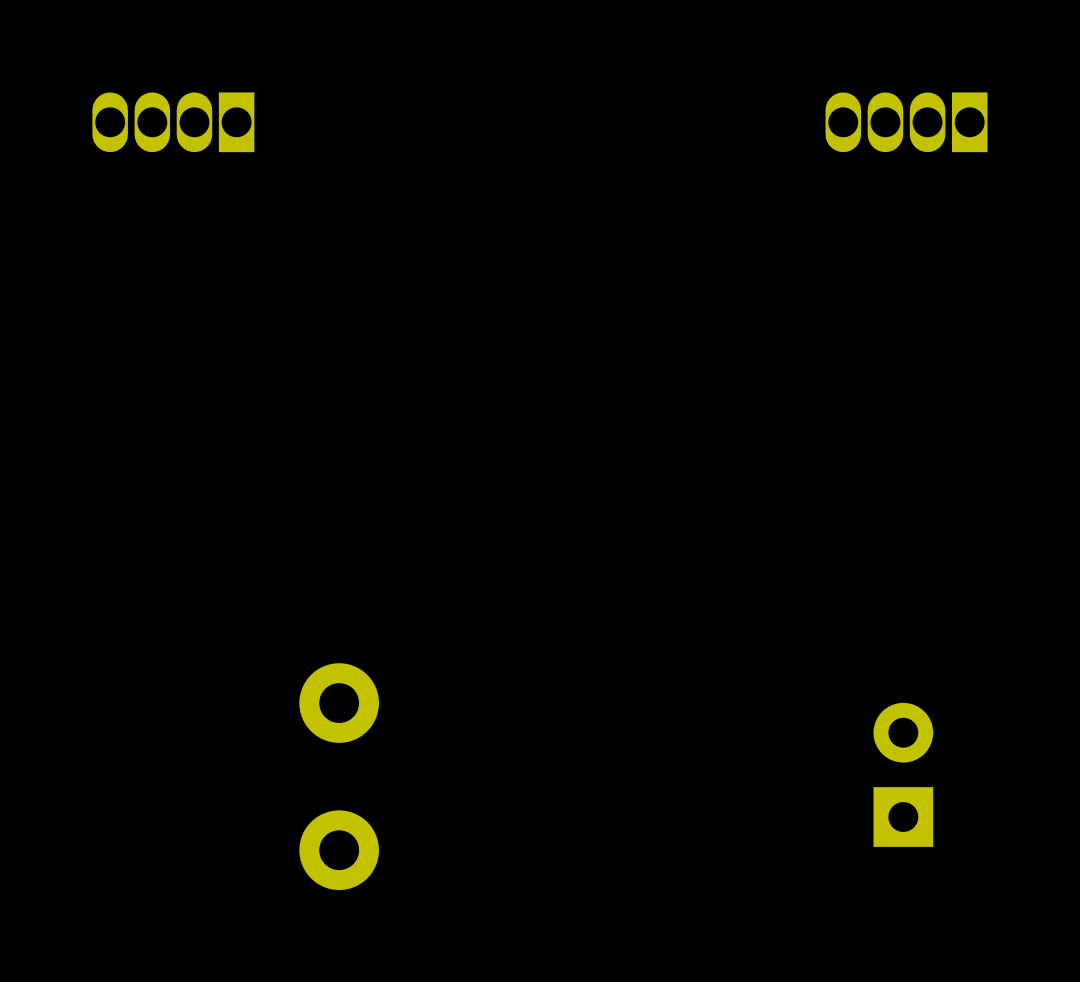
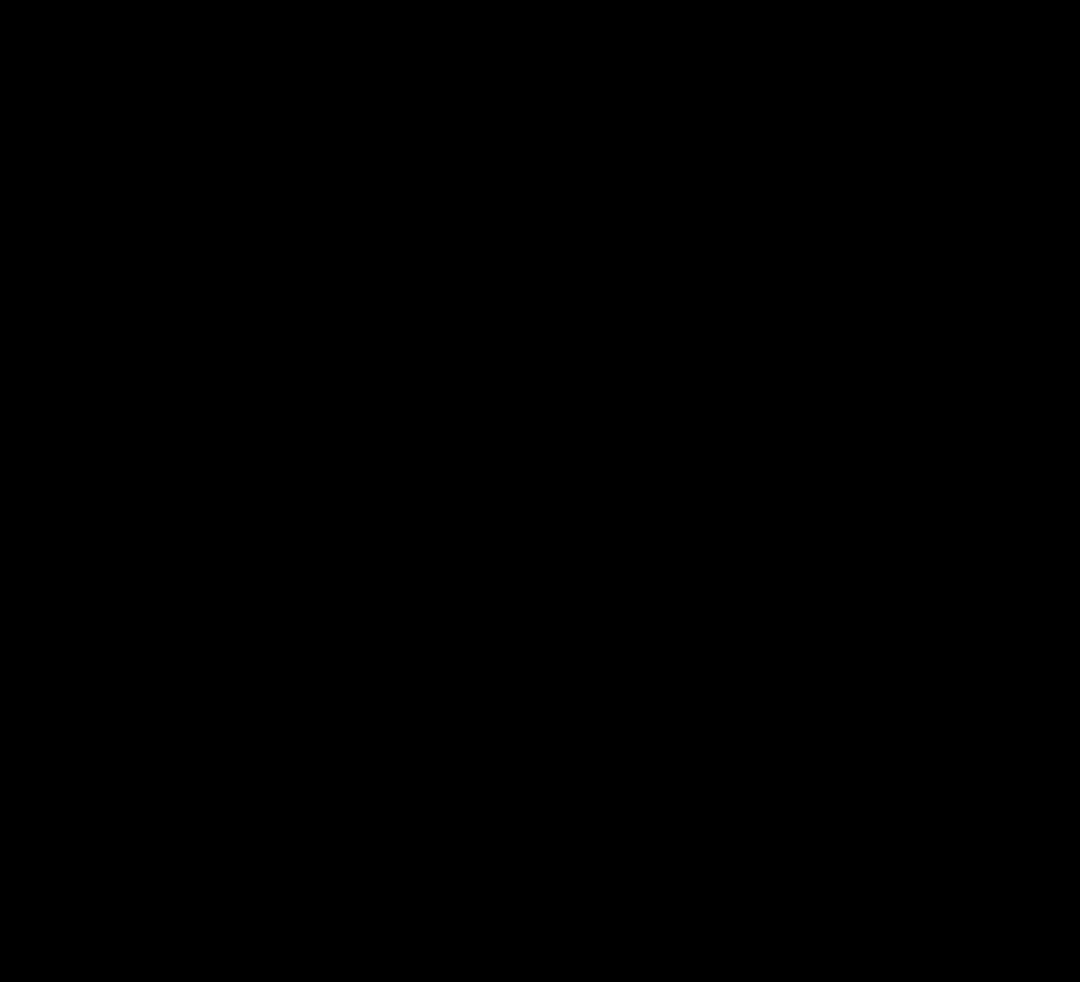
part: (173, 122) -> none
part: (906, 122) -> none
part: (903, 774) -> none
part: (339, 776) -> none

